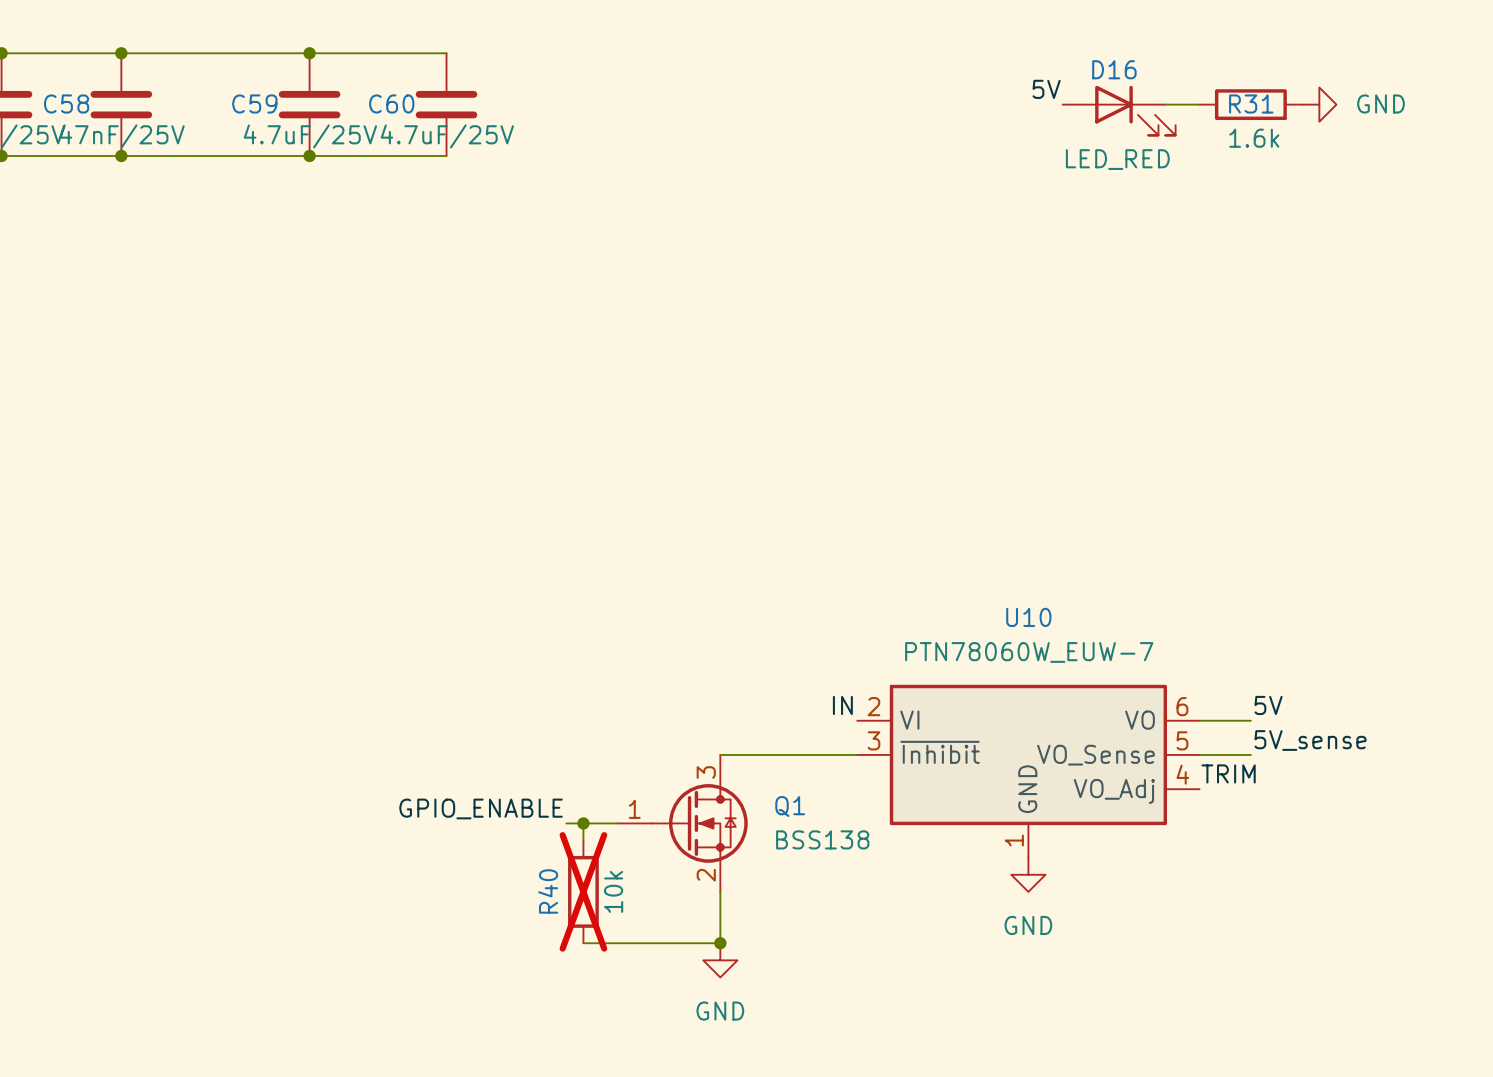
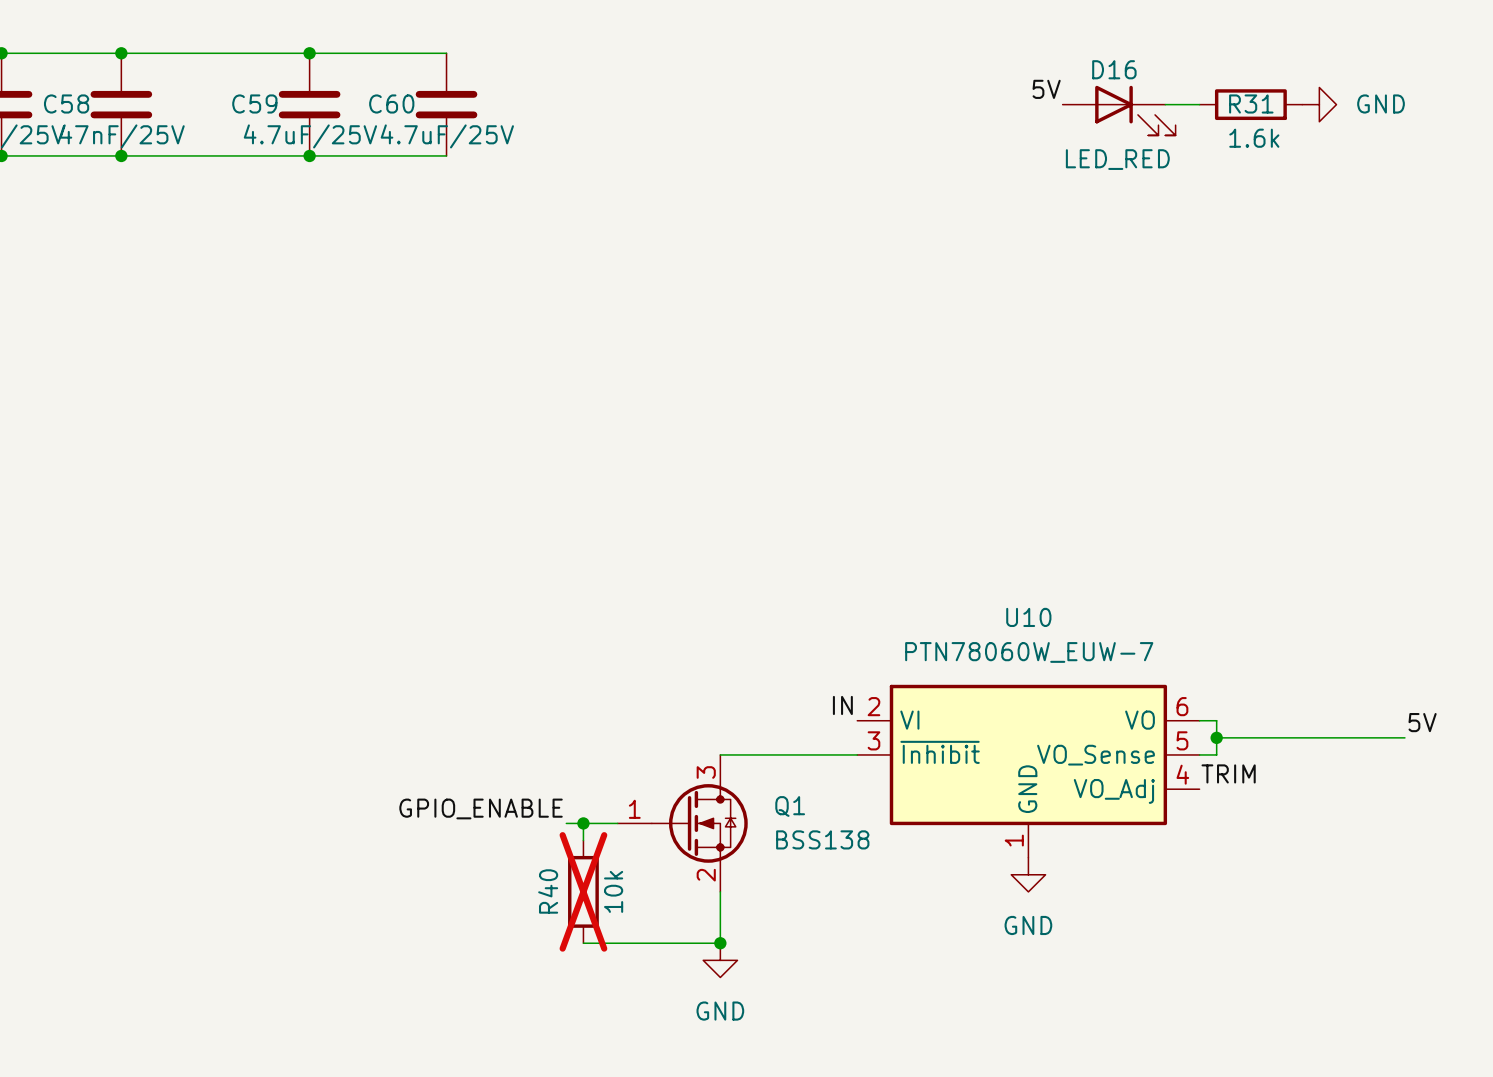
label position: 5V (1268, 705) -> 5V (1422, 722)
wire: (1216, 720) (1250, 720) -> (1216, 720) (1216, 754)
wire: none -> (1216, 737) (1404, 737)
junction: none -> (1216, 737)
label: 5V_sense (1310, 740) -> none
wire: (1216, 754) (1250, 754) -> none

